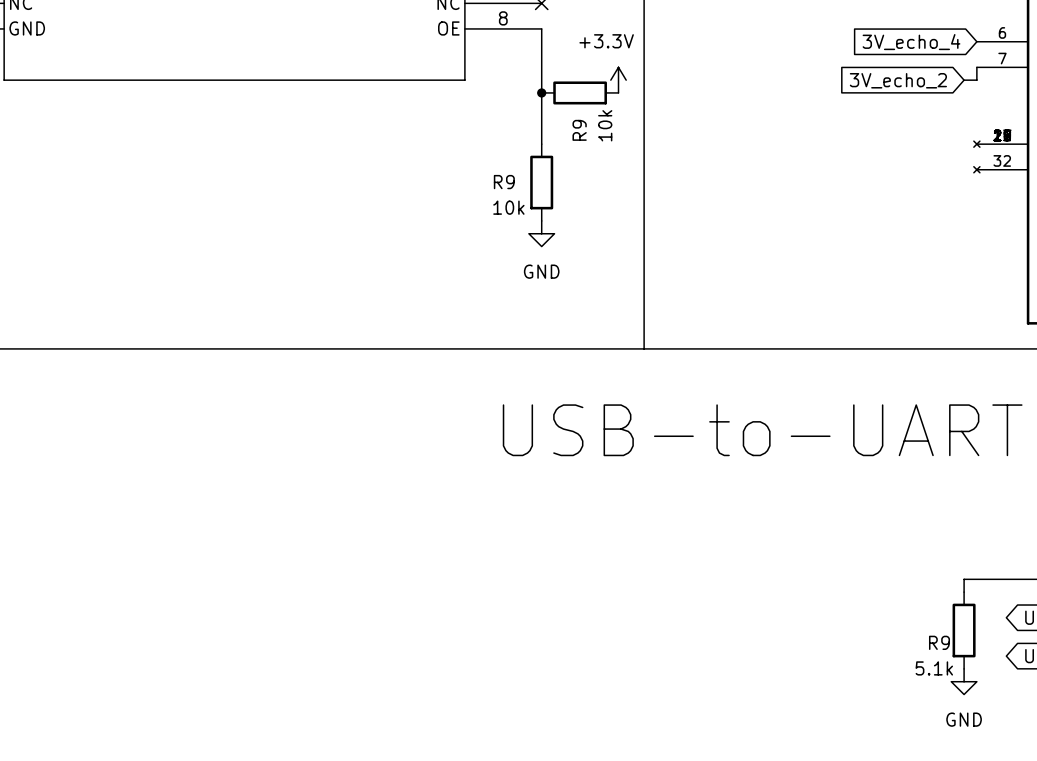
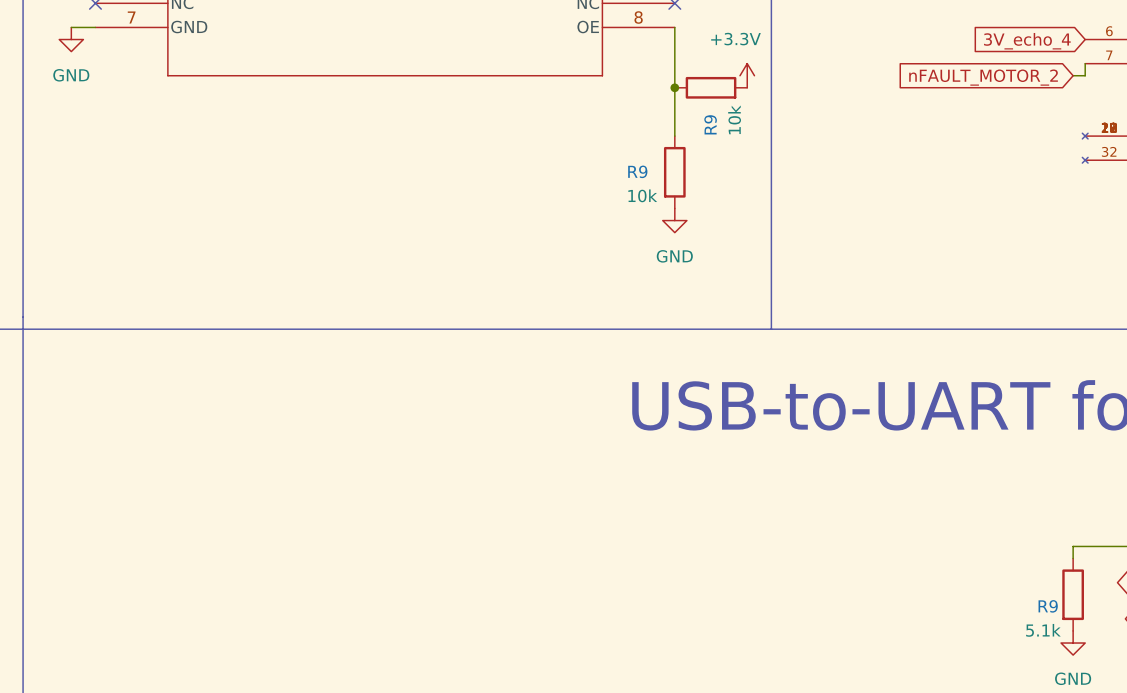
global label: 3V_echo_2 (898, 80) -> nFAULT_MOTOR_2 (983, 77)

